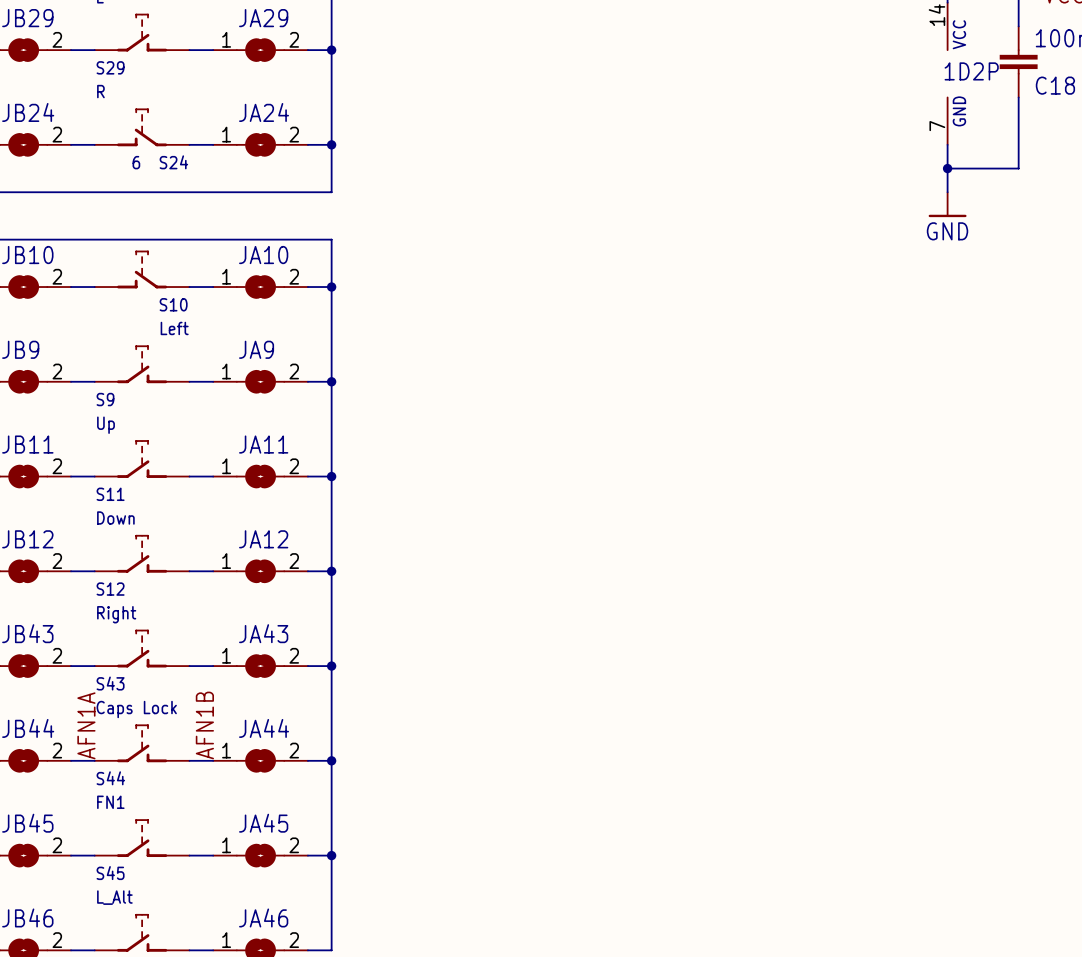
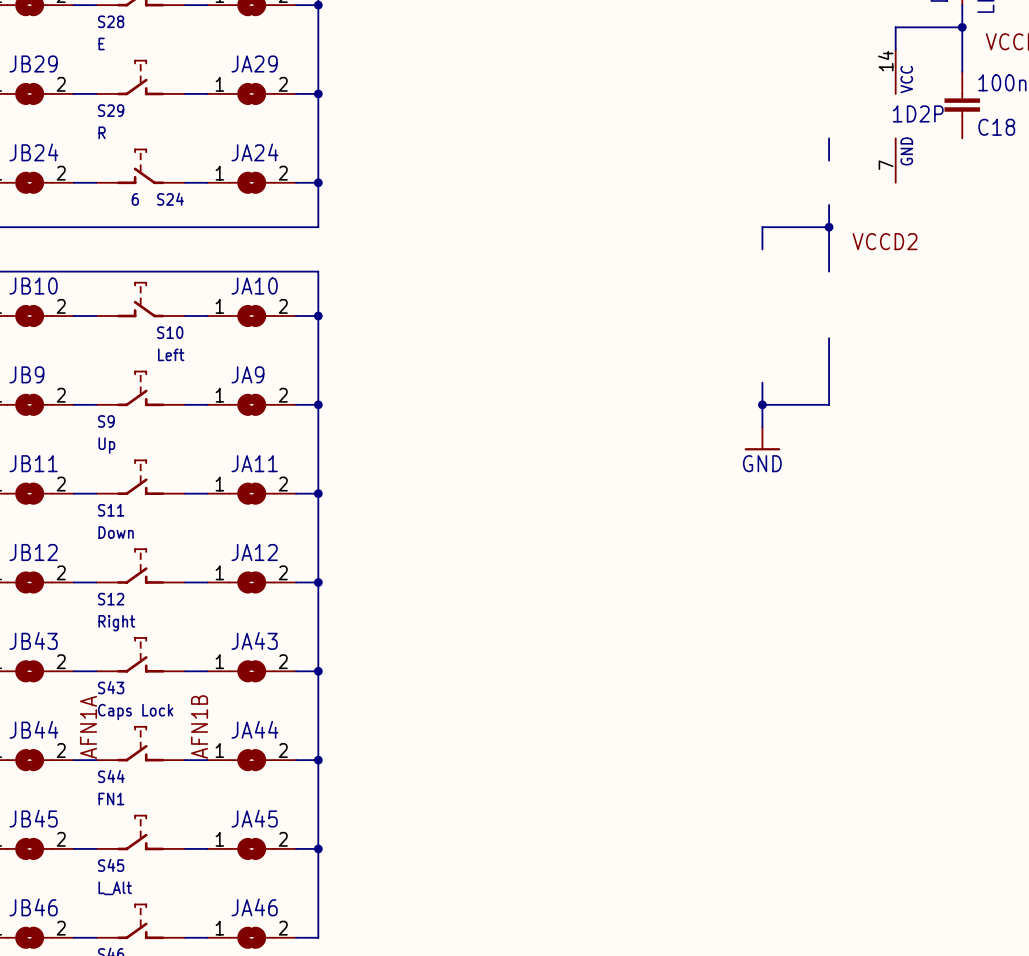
wire: none -> (829, 138) (829, 160)
wire: (1018, 97) (1018, 168) (947, 168) -> none
wire: (947, 144) (947, 192) -> none
wire: none -> (829, 204) (829, 271)
junction: (947, 168) -> none
wire: none -> (829, 227) (762, 227) (762, 249)
junction: none -> (829, 227)
power symbol: GND (947, 204) -> none
label: none -> VCCD2 (885, 241)
wire: none -> (829, 338) (829, 404) (762, 404)
wire: none -> (762, 382) (762, 427)
junction: none -> (762, 404)
power symbol: none -> GND (762, 438)

